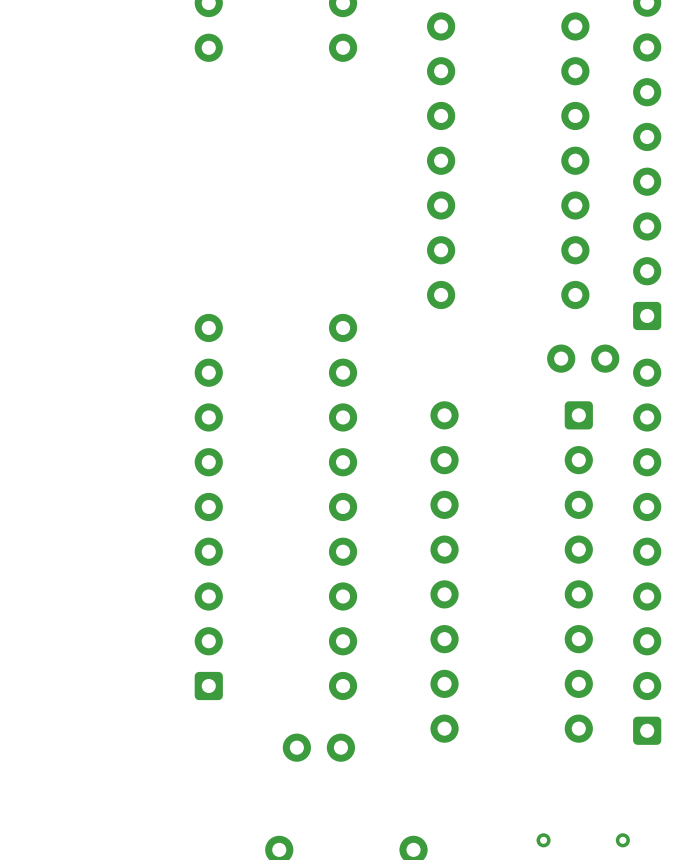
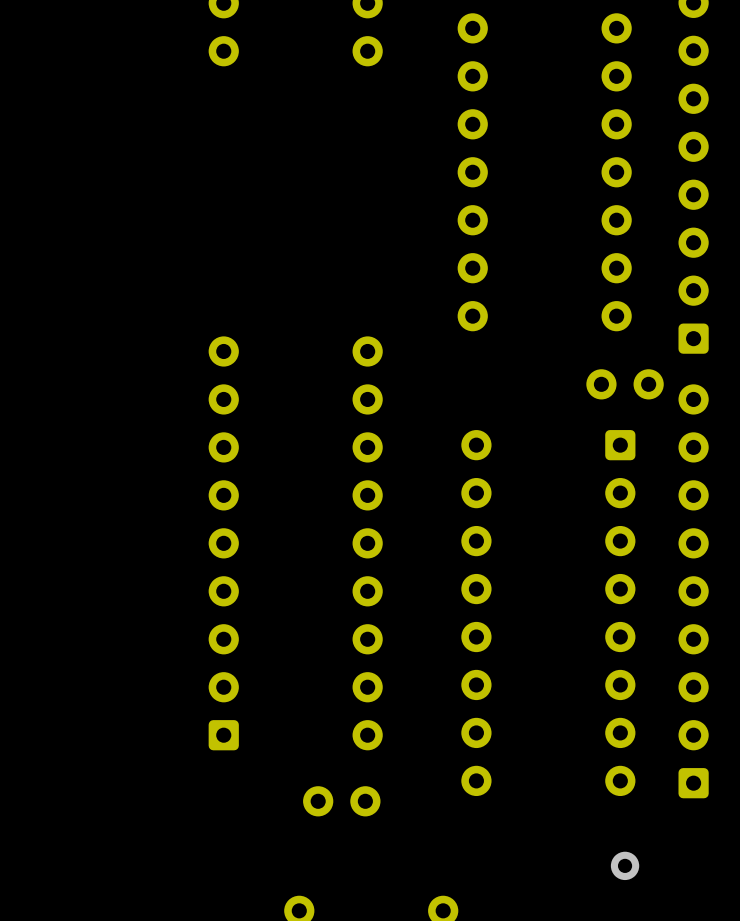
via: none -> (625, 865)
via: (543, 840) -> none
via: (622, 840) -> none

